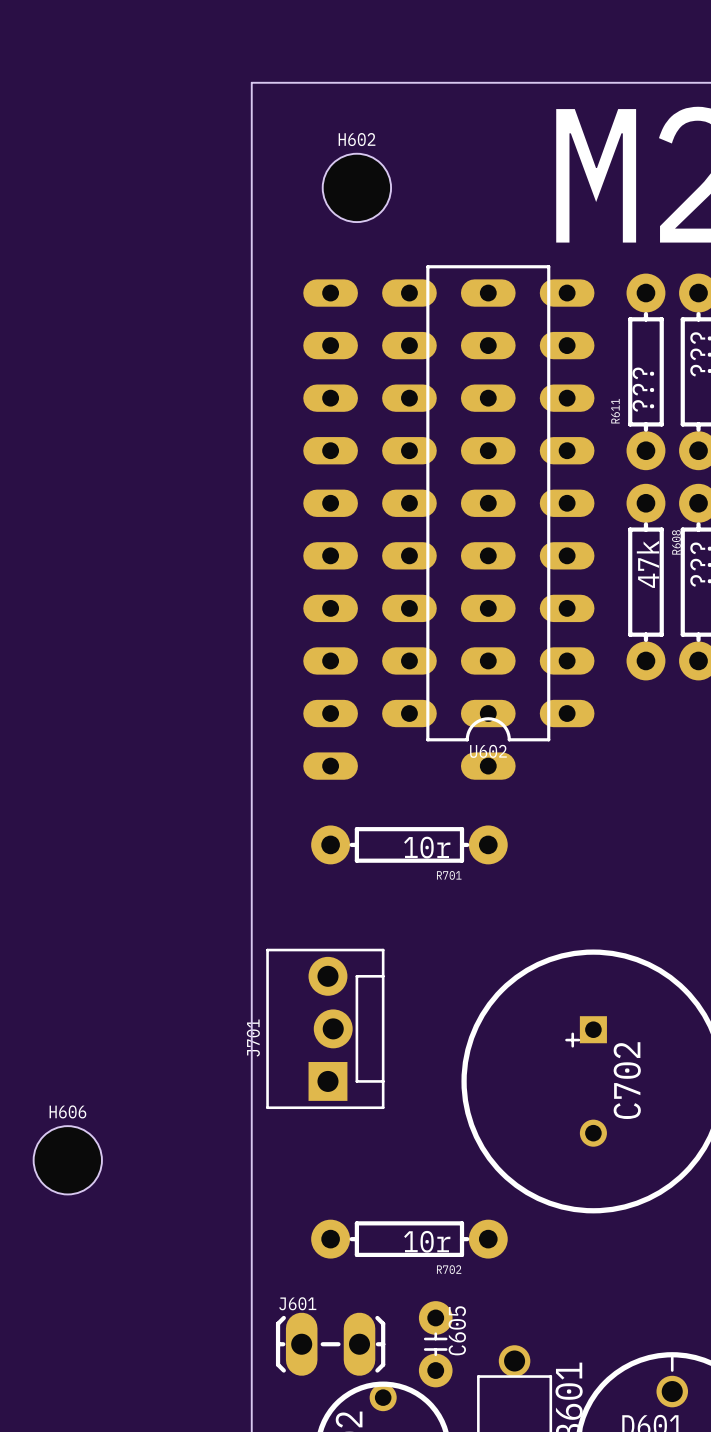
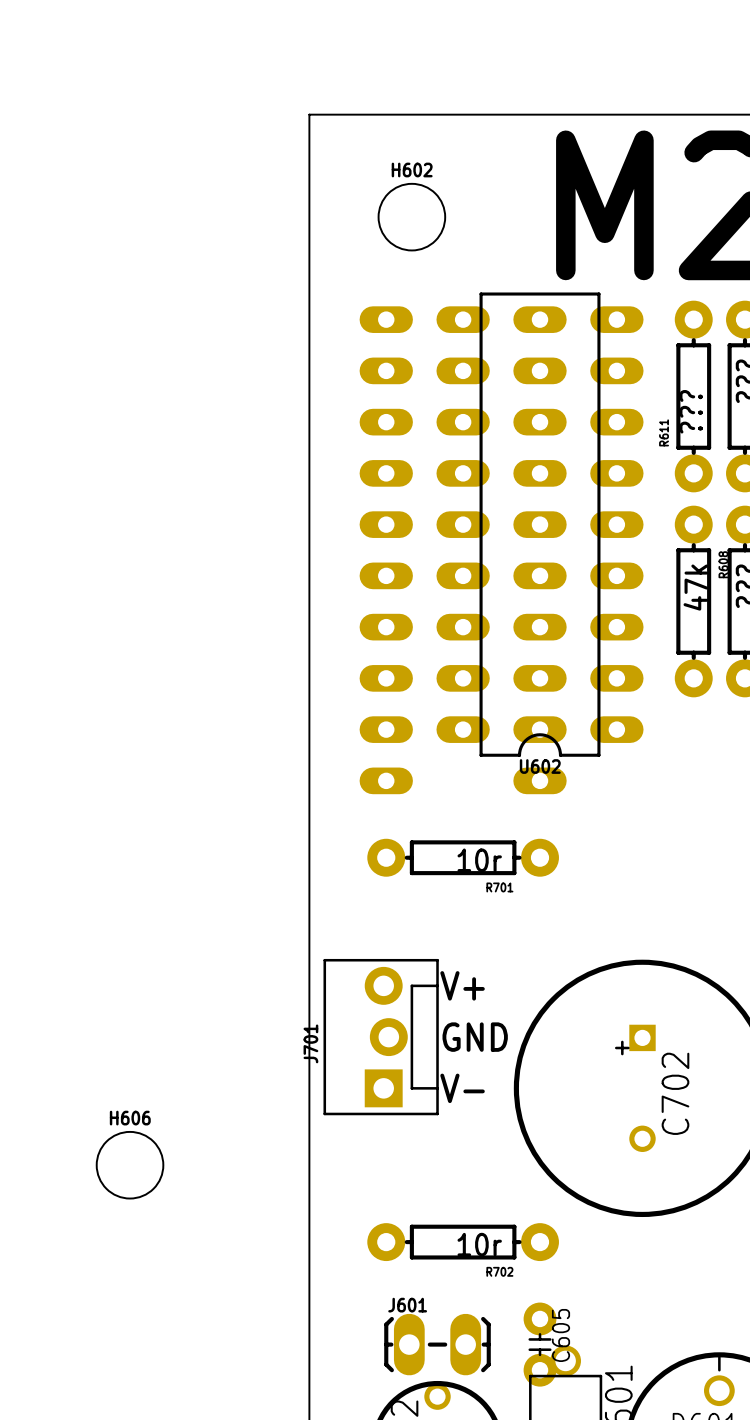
text: none -> V+ (462, 985)
text: none -> GND (475, 1037)
text: none -> V- (462, 1088)
J601 position: (330, 1344) -> (437, 1344)
C605 position: (435, 1344) -> (540, 1344)

